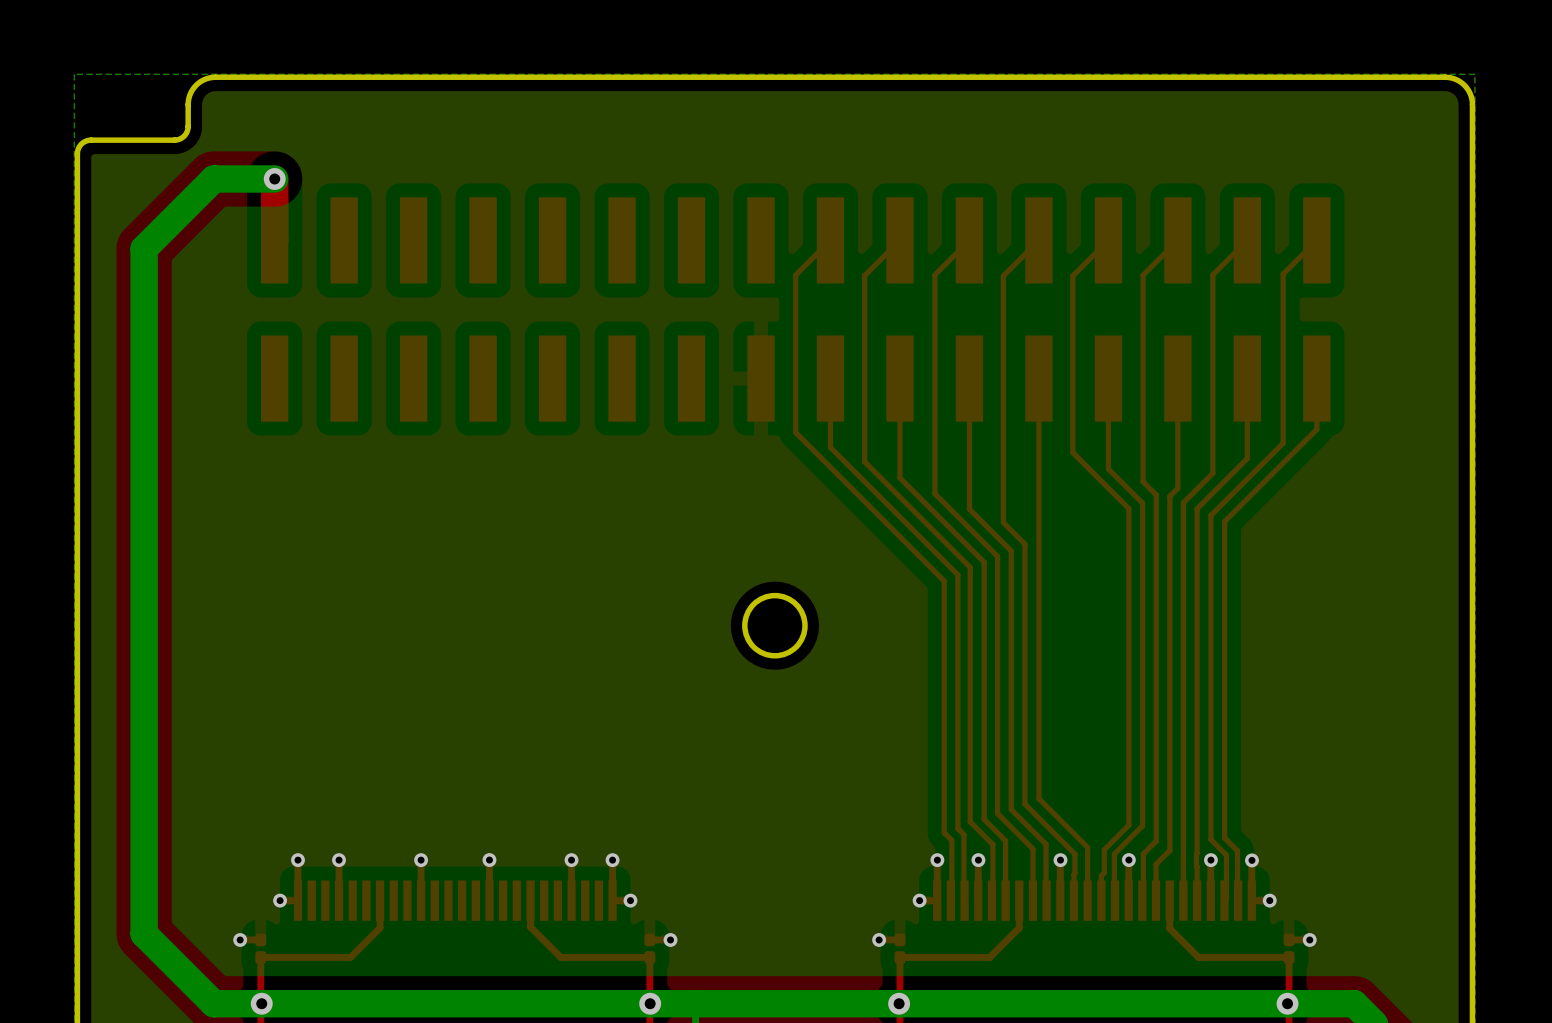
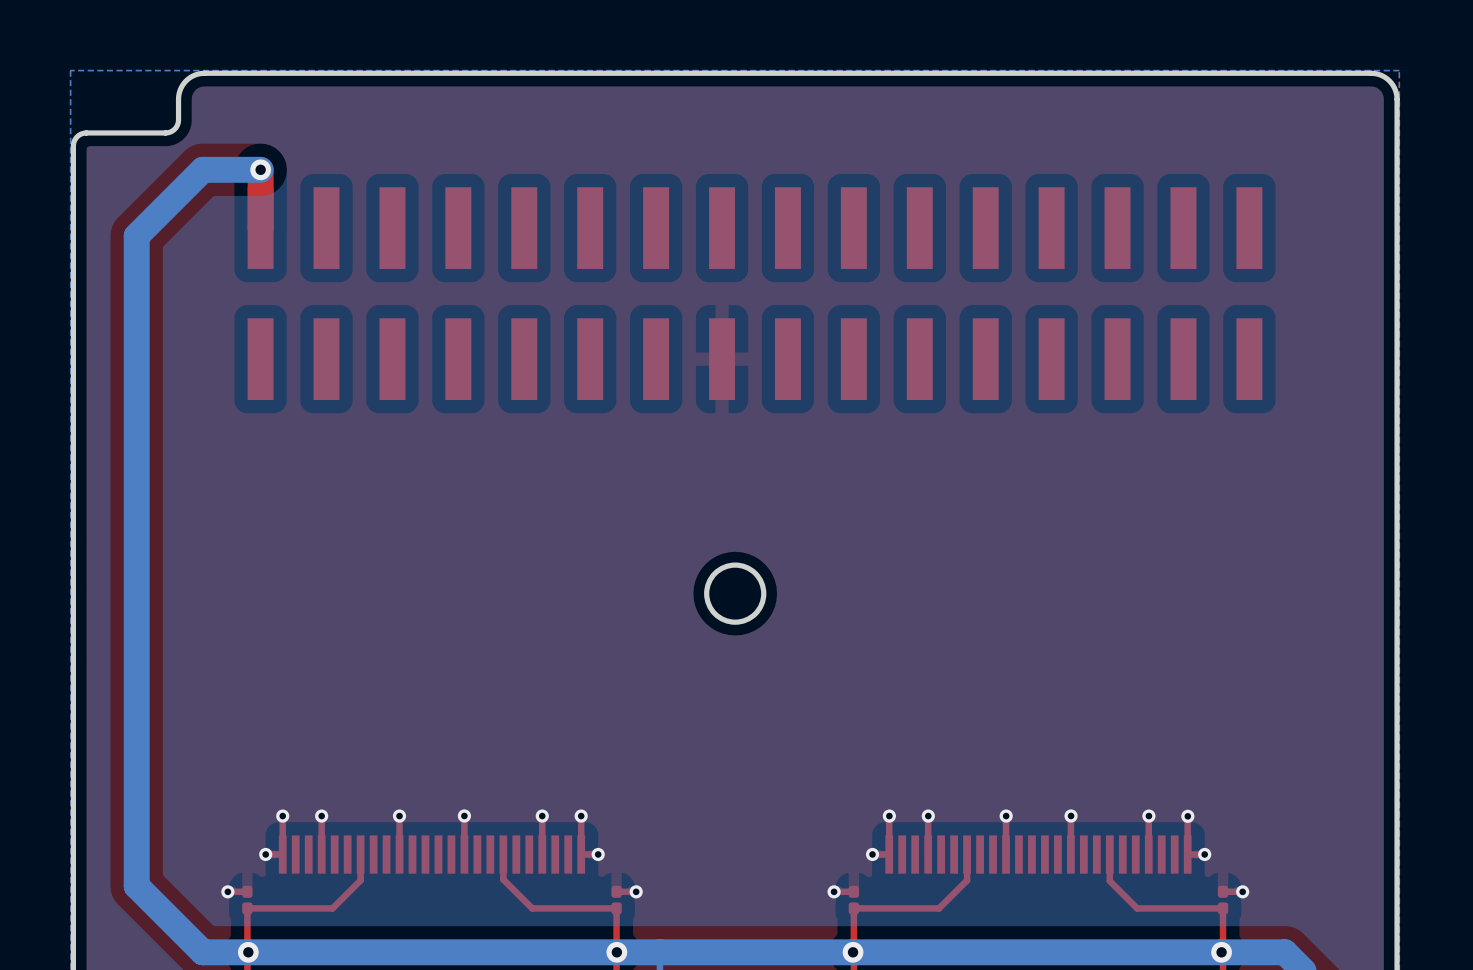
top track: (830, 240) (795, 275) (795, 432) (944, 581) (944, 832) (951, 840) (950, 900) -> none
top track: (899, 240) (864, 275) (864, 461) (970, 567) (970, 821) (992, 844) (991, 900) -> none
top track: (969, 240) (934, 274) (934, 493) (997, 556) (997, 813) (1032, 849) (1032, 900) -> none
top track: (1038, 240) (1003, 276) (1003, 522) (1024, 544) (1024, 804) (1074, 854) (1074, 900) -> none
top track: (1108, 240) (1072, 276) (1072, 452) (1128, 508) (1128, 825) (1104, 849) (1101, 900) -> none
top track: (1177, 240) (1143, 275) (1143, 481) (1156, 494) (1156, 841) (1143, 854) (1142, 900) -> none
top track: (1247, 240) (1212, 274) (1212, 473) (1183, 502) (1183, 900) -> none
top track: (1316, 240) (1283, 274) (1283, 443) (1210, 515) (1210, 839) (1226, 855) (1226, 898) (1224, 900) -> none
top track: (830, 378) (830, 447) (957, 574) (957, 828) (963, 834) (964, 900) -> none
top track: (899, 378) (899, 478) (984, 562) (984, 819) (1005, 840) (1005, 900) -> none
top track: (969, 378) (969, 509) (1011, 551) (1011, 809) (1046, 844) (1046, 900) -> none
top track: (1038, 378) (1038, 798) (1087, 847) (1087, 900) -> none
top track: (1108, 378) (1108, 469) (1142, 503) (1142, 825) (1114, 854) (1115, 900) -> none
top track: (1177, 378) (1177, 488) (1169, 496) (1169, 850) (1156, 864) (1156, 900) -> none
top track: (1247, 378) (1247, 458) (1197, 508) (1197, 900) -> none
top track: (1316, 378) (1316, 429) (1224, 521) (1224, 837) (1237, 850) (1238, 900) -> none

